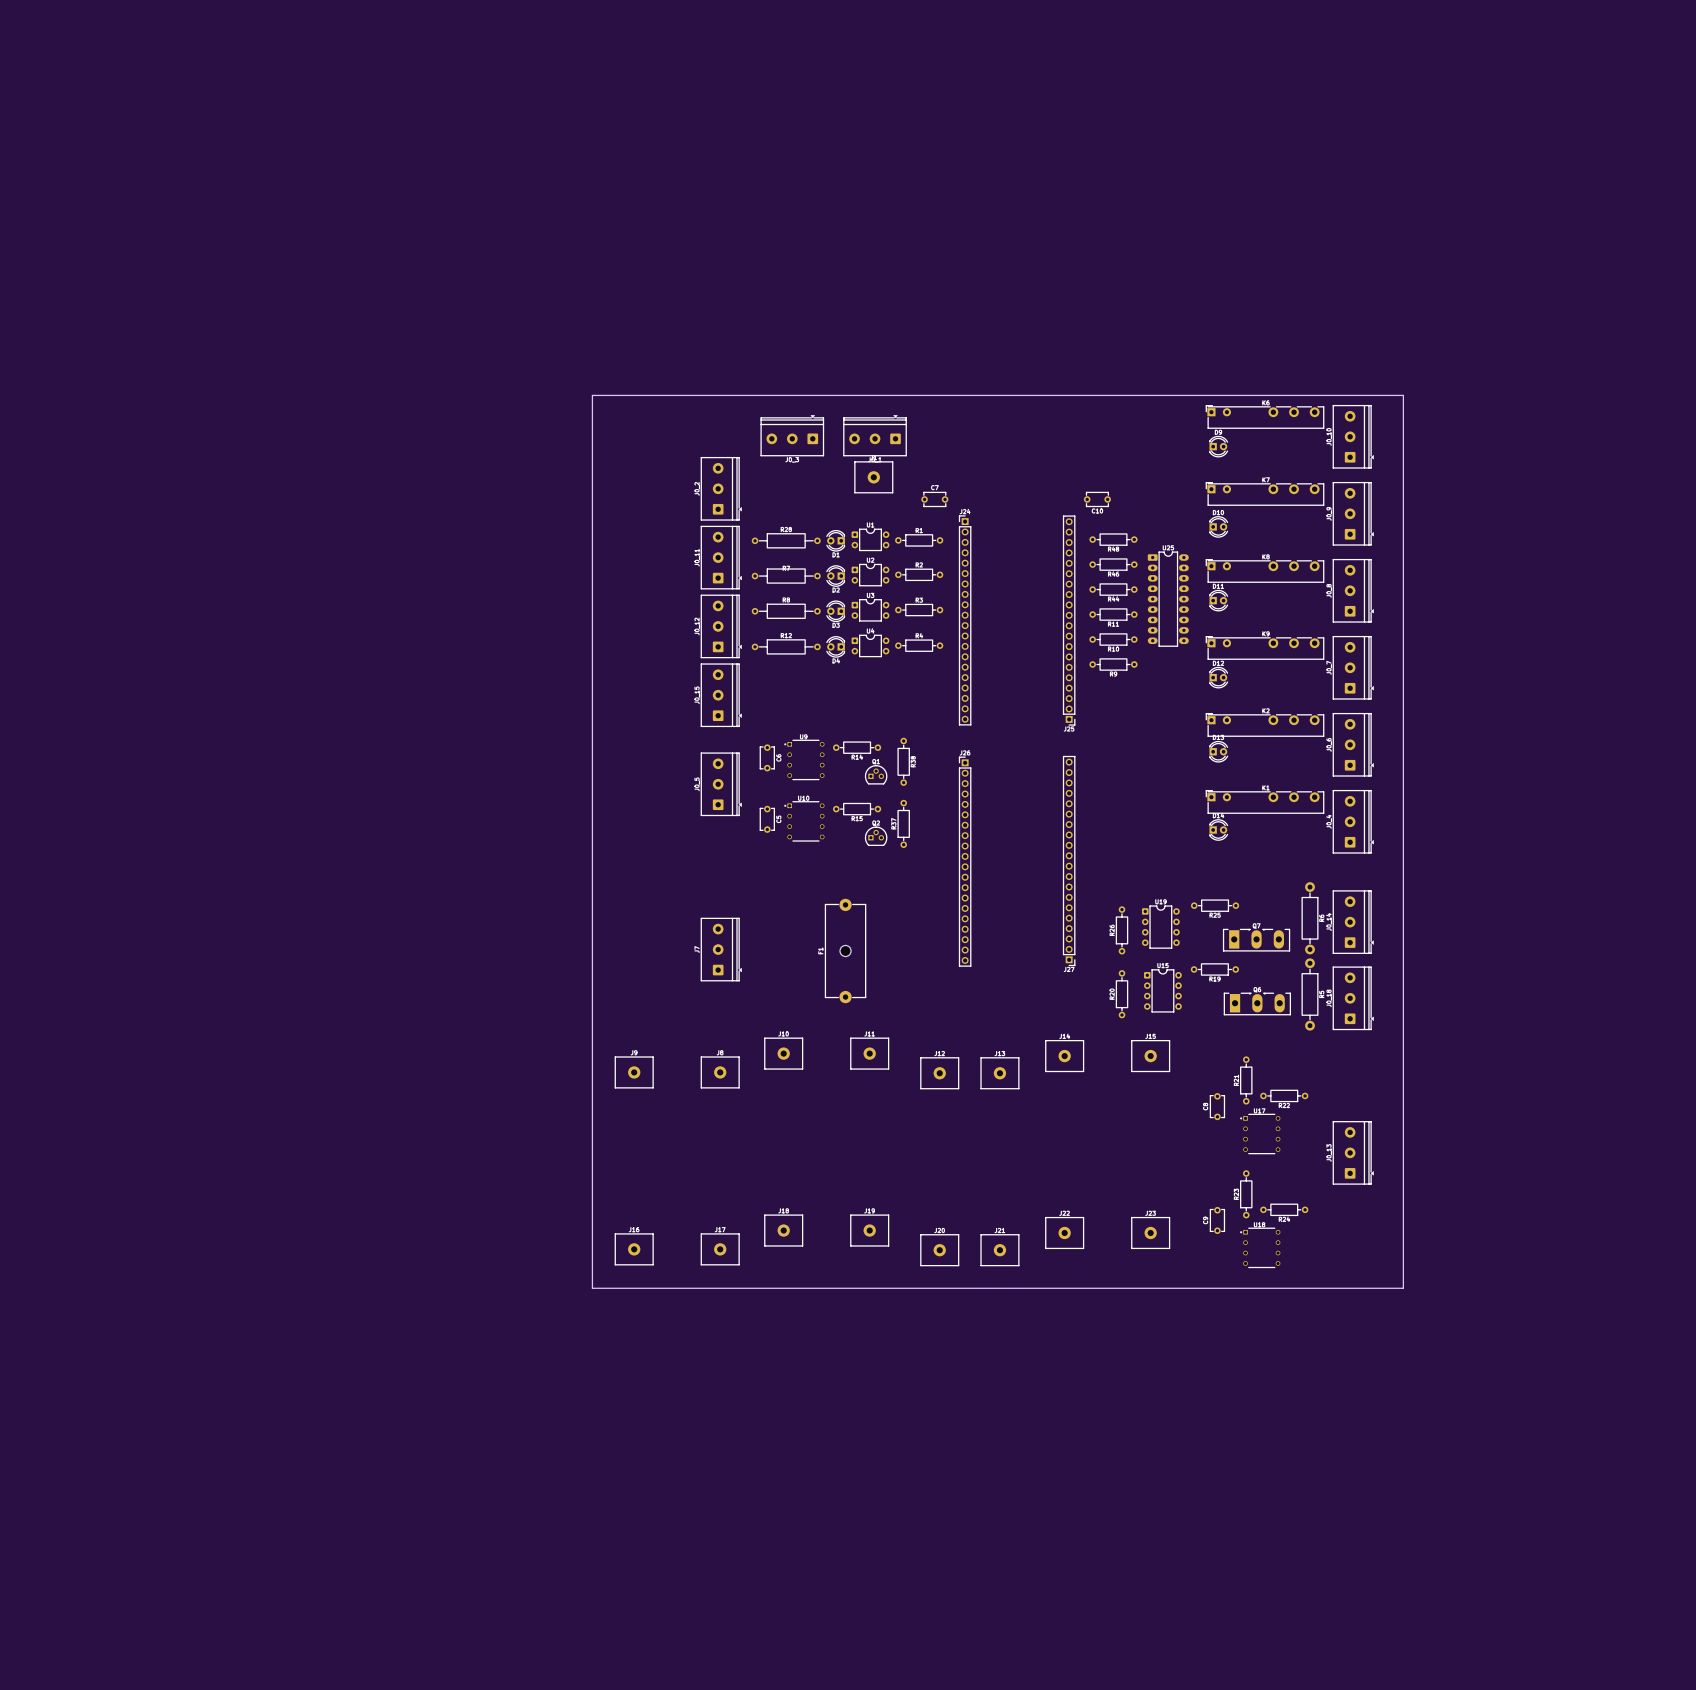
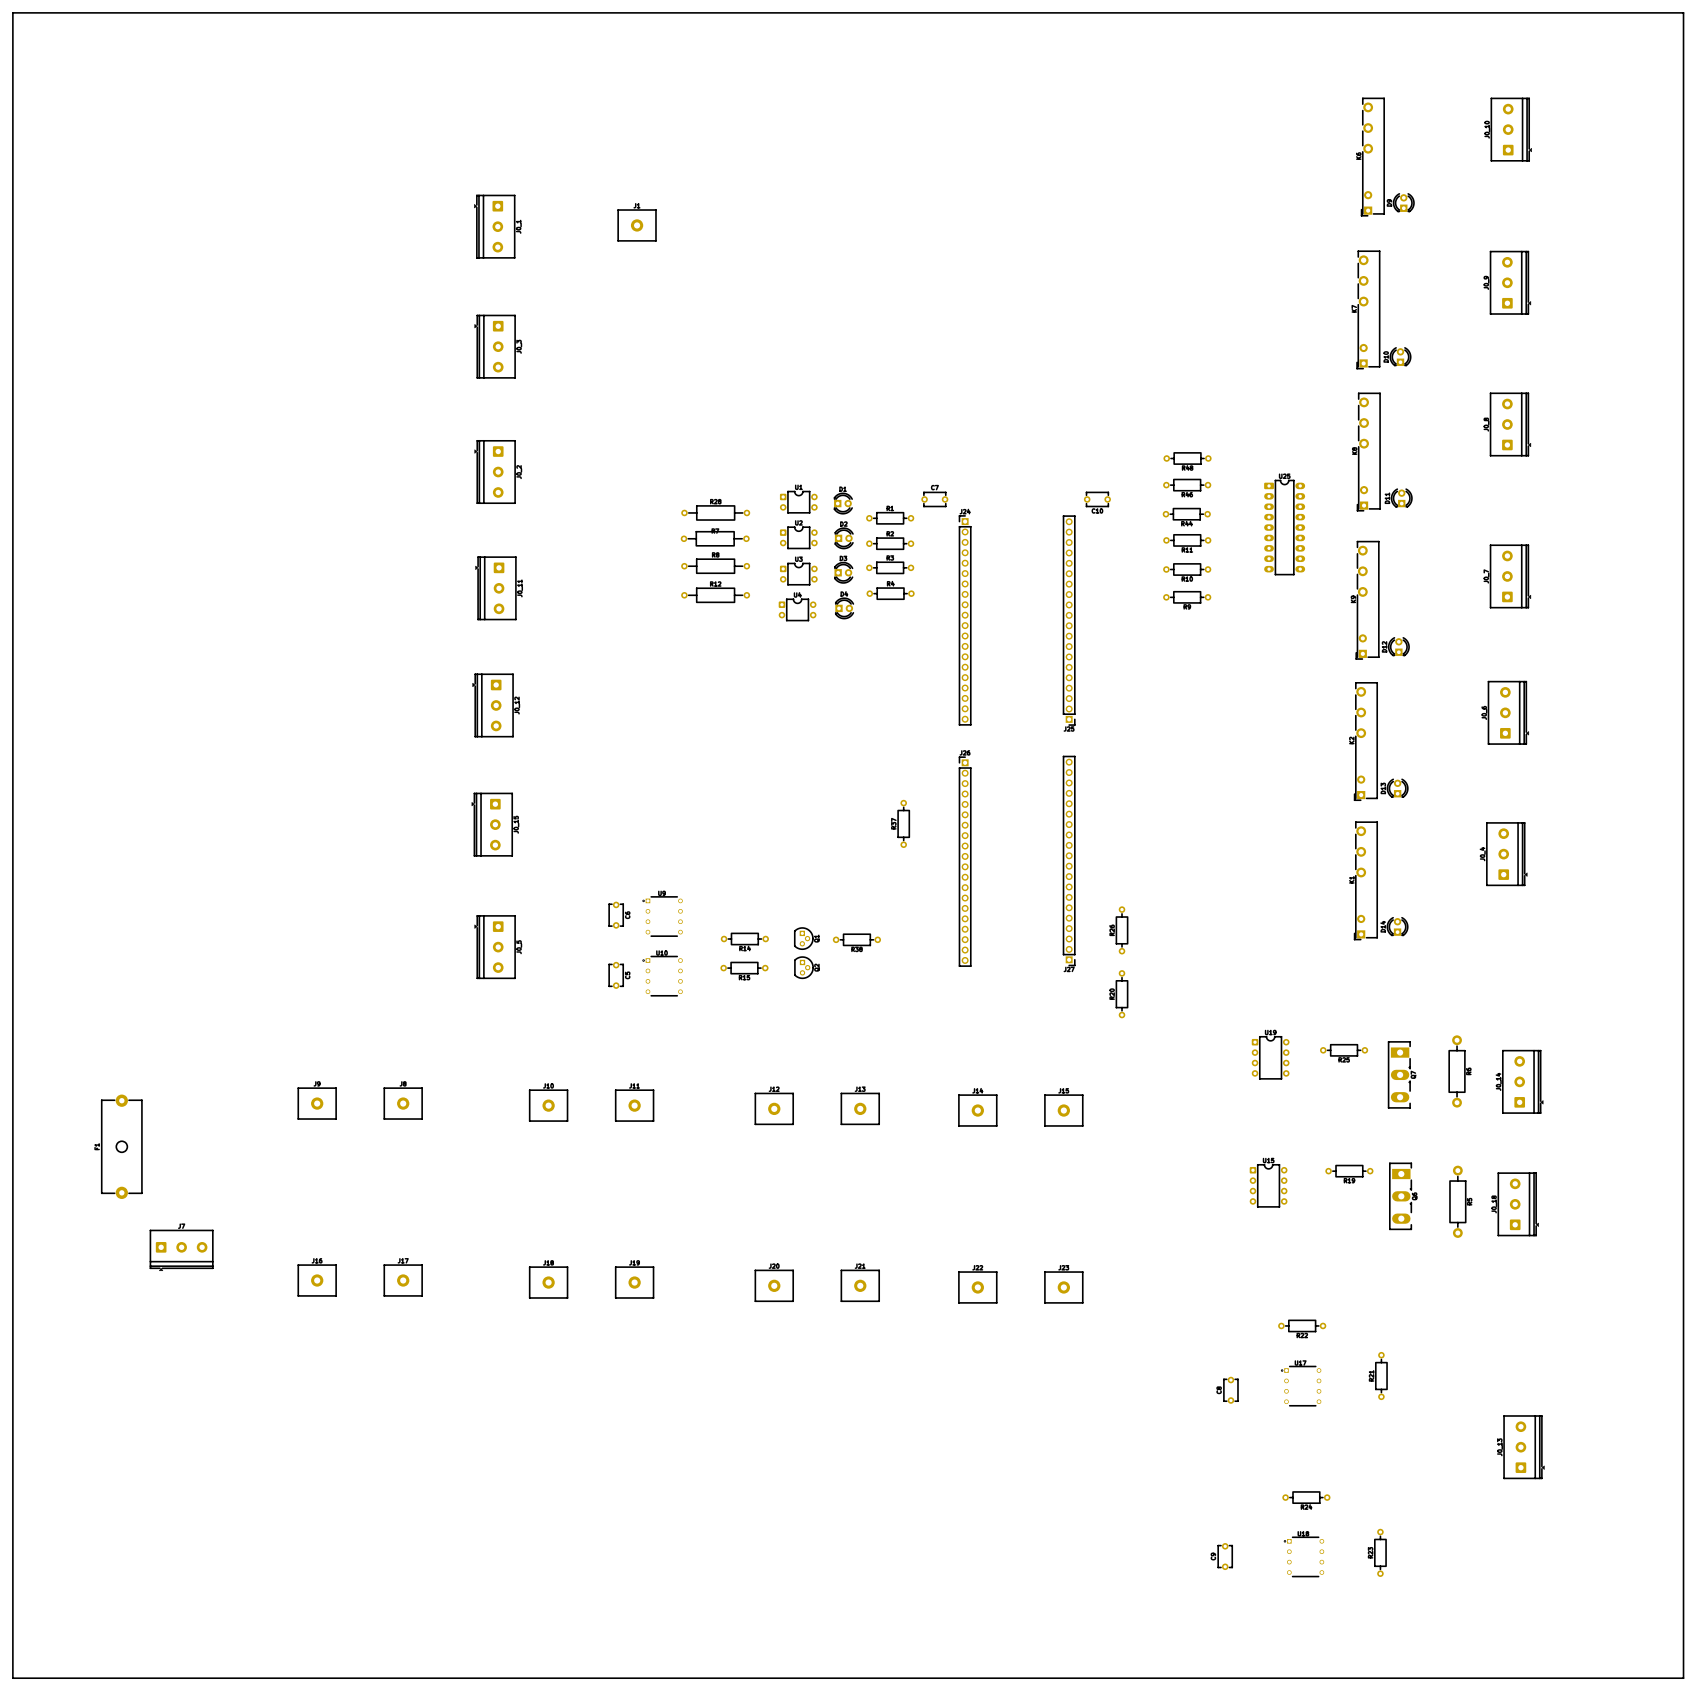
board edge: none -> (12, 12) (1683, 12) (1683, 1678) (12, 1678) (12, 12)
board edge: (592, 395) (1403, 395) (1403, 1288) (592, 1288) (592, 395) -> none
part rotation: 0° (1265, 416) -> 90° counterclockwise (1372, 157)
part position: (1265, 416) -> (1372, 157)
part rotation: 0° (792, 435) -> 90° counterclockwise (494, 346)
part position: (792, 435) -> (494, 346)
part rotation: 0° (875, 435) -> 90° counterclockwise (494, 226)
part position: (875, 435) -> (494, 226)
part position: (1353, 436) -> (1511, 129)
part rotation: 0° (1218, 446) -> 90° counterclockwise (1403, 202)
part position: (1218, 446) -> (1403, 202)
part position: (873, 477) -> (637, 225)
part rotation: 0° (721, 488) -> 180° (494, 472)
part position: (721, 488) -> (494, 472)
part rotation: 0° (1265, 493) -> 90° counterclockwise (1368, 309)
part position: (1265, 493) -> (1368, 309)
part position: (1353, 513) -> (1510, 282)
part rotation: 0° (1218, 526) -> 90° counterclockwise (1400, 356)
part position: (1218, 526) -> (1400, 356)
part position: (870, 539) -> (798, 502)
part position: (1113, 539) -> (1187, 458)
part position: (786, 540) -> (715, 512)
part rotation: 0° (835, 540) -> 180° (843, 503)
part position: (835, 540) -> (843, 503)
part position: (919, 540) -> (890, 518)
part rotation: 0° (721, 557) -> 180° (495, 588)
part position: (721, 557) -> (495, 588)
part position: (1113, 564) -> (1187, 485)
part rotation: 0° (1265, 570) -> 90° counterclockwise (1368, 452)
part position: (1265, 570) -> (1368, 452)
part position: (919, 574) -> (890, 543)
part position: (870, 575) -> (798, 537)
part position: (786, 576) -> (715, 538)
part rotation: 0° (835, 576) -> 180° (844, 538)
part position: (835, 576) -> (844, 538)
part position: (1113, 589) -> (1186, 514)
part position: (1353, 590) -> (1510, 424)
part position: (1168, 599) -> (1284, 527)
part rotation: 0° (1218, 600) -> 90° counterclockwise (1401, 498)
part position: (1218, 600) -> (1401, 498)
part position: (870, 610) -> (798, 574)
part position: (919, 610) -> (890, 567)
part position: (786, 611) -> (715, 566)
part rotation: 0° (835, 611) -> 180° (843, 572)
part position: (835, 611) -> (843, 572)
part position: (1113, 614) -> (1187, 540)
part rotation: 0° (721, 626) -> 180° (492, 705)
part position: (721, 626) -> (492, 705)
part position: (1113, 639) -> (1187, 569)
part position: (870, 645) -> (797, 609)
part position: (919, 645) -> (890, 593)
part position: (786, 646) -> (715, 595)
part rotation: 0° (835, 646) -> 180° (844, 608)
part position: (835, 646) -> (844, 608)
part rotation: 0° (1265, 647) -> 90° counterclockwise (1367, 600)
part position: (1265, 647) -> (1367, 600)
part position: (1113, 664) -> (1187, 597)
part position: (1353, 667) -> (1510, 576)
part rotation: 0° (1218, 677) -> 90° counterclockwise (1398, 646)
part position: (1218, 677) -> (1398, 646)
part rotation: 0° (721, 695) -> 180° (492, 824)
part position: (721, 695) -> (492, 824)
part rotation: 0° (1265, 724) -> 90° counterclockwise (1365, 741)
part position: (1265, 724) -> (1365, 741)
part position: (1353, 744) -> (1508, 712)
part position: (857, 747) -> (744, 939)
part rotation: 0° (1218, 751) -> 90° counterclockwise (1397, 788)
part position: (1218, 751) -> (1397, 788)
part position: (767, 757) -> (616, 915)
part position: (804, 759) -> (662, 916)
part rotation: 0° (903, 761) -> 90° clockwise (856, 939)
part position: (903, 761) -> (856, 939)
part rotation: 0° (876, 774) -> 90° clockwise (803, 938)
part position: (876, 774) -> (803, 938)
part rotation: 0° (721, 784) -> 180° (494, 947)
part position: (721, 784) -> (494, 947)
part rotation: 0° (1265, 801) -> 90° counterclockwise (1365, 880)
part position: (1265, 801) -> (1365, 880)
part position: (857, 809) -> (744, 968)
part position: (767, 819) -> (616, 975)
part position: (804, 821) -> (662, 976)
part position: (1353, 821) -> (1507, 854)
part rotation: 0° (1218, 829) -> 90° counterclockwise (1397, 926)
part position: (1218, 829) -> (1397, 926)
part rotation: 0° (876, 836) -> 90° clockwise (804, 967)
part position: (876, 836) -> (804, 967)
part position: (1215, 905) -> (1344, 1050)
part position: (1309, 918) -> (1457, 1071)
part position: (1353, 922) -> (1522, 1081)
part position: (1160, 927) -> (1270, 1057)
part rotation: 0° (1256, 940) -> 90° clockwise (1399, 1074)
part position: (1256, 940) -> (1399, 1074)
part rotation: 0° (721, 949) -> 90° clockwise (181, 1250)
part position: (721, 949) -> (181, 1250)
part position: (845, 951) -> (121, 1146)
part position: (1214, 969) -> (1349, 1171)
part position: (1162, 990) -> (1268, 1185)
part position: (1309, 994) -> (1457, 1201)
part position: (1353, 998) -> (1518, 1204)
part rotation: 0° (1257, 1003) -> 90° clockwise (1400, 1196)
part position: (1257, 1003) -> (1400, 1196)
part position: (783, 1053) -> (548, 1105)
part position: (869, 1053) -> (634, 1105)
part position: (1064, 1056) -> (977, 1110)
part position: (1150, 1056) -> (1063, 1110)
part position: (634, 1072) -> (317, 1103)
part position: (720, 1072) -> (403, 1103)
part position: (939, 1073) -> (774, 1108)
part position: (999, 1073) -> (860, 1108)
part position: (1246, 1080) -> (1381, 1376)
part position: (1284, 1095) -> (1302, 1325)
part position: (1217, 1106) -> (1230, 1390)
part position: (1260, 1134) -> (1301, 1386)
part position: (1353, 1152) -> (1524, 1447)
part position: (1246, 1194) -> (1380, 1552)
part position: (1284, 1209) -> (1306, 1497)
part position: (1217, 1220) -> (1225, 1556)
part position: (783, 1230) -> (548, 1282)
part position: (869, 1230) -> (634, 1282)
part position: (1064, 1232) -> (977, 1287)
part position: (1150, 1232) -> (1063, 1287)
part position: (1260, 1247) -> (1304, 1556)
part position: (634, 1249) -> (317, 1280)
part position: (720, 1249) -> (403, 1280)
part position: (939, 1250) -> (774, 1285)
part position: (999, 1250) -> (860, 1285)

